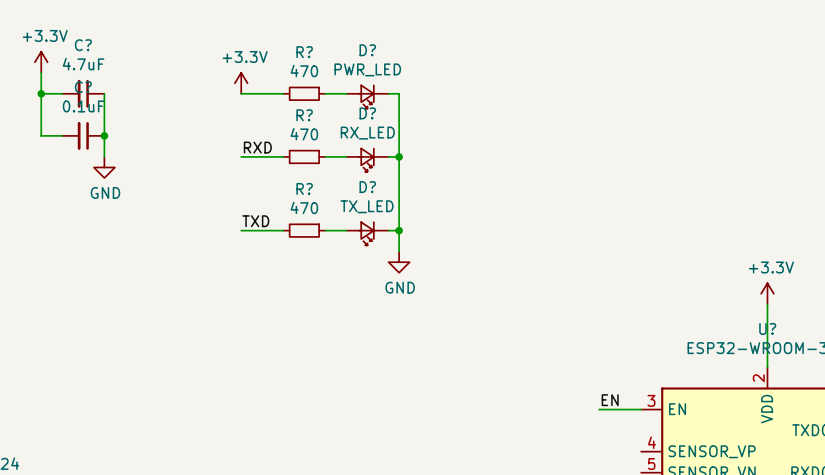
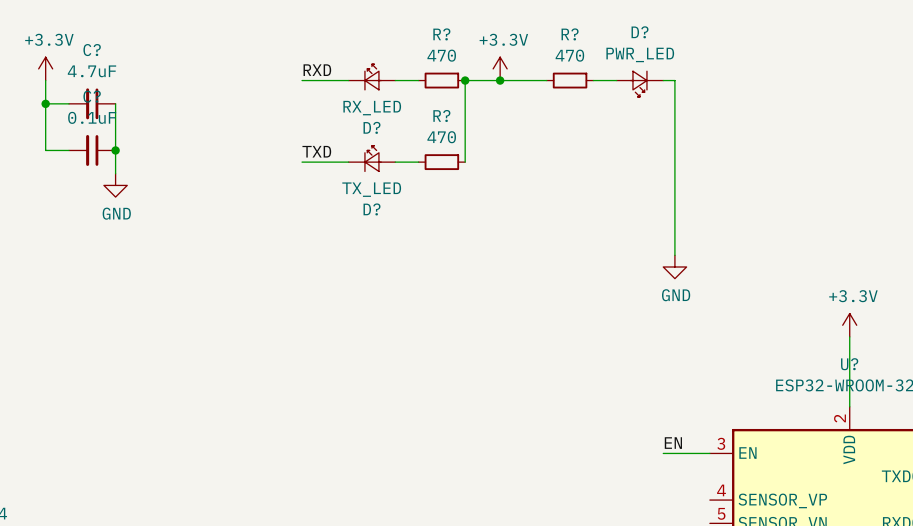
power symbol: none -> +3.3V (500, 68)
R?: none -> 470 (441, 80)
junction: none -> (465, 80)
junction: none -> (500, 80)
wire: none -> (546, 80) (465, 80) (465, 162)
R?: none -> 470 (570, 80)
wire: none -> (593, 80) (616, 80)
wire: none -> (663, 80) (674, 80) (674, 255)
D?: none -> PWR_LED (639, 84)
power symbol: +3.3V (241, 83) -> none
wire: (241, 93) (283, 93) -> none
R?: 470 (304, 93) -> none
wire: (325, 93) (346, 93) -> none
wire: (388, 93) (399, 93) (399, 251) -> none
D?: PWR_LED (367, 96) -> none
R?: none -> 470 (441, 162)
label position: RXD (257, 147) -> RXD (317, 70)
wire: (241, 156) (283, 156) -> (302, 80) (348, 80)
R?: 470 (304, 156) -> none
wire: (325, 156) (346, 156) -> (395, 80) (418, 80)
wire: (388, 156) (399, 156) -> none
junction: (399, 156) -> none
D? rotation: 0° (366, 160) -> 180° (373, 77)
D? position: (367, 160) -> (371, 77)
label position: TXD (255, 221) -> TXD (316, 151)
wire: (241, 230) (283, 230) -> (302, 162) (348, 162)
R?: 470 (304, 230) -> none
wire: (325, 230) (346, 230) -> (395, 162) (418, 162)
wire: (388, 230) (399, 230) -> none
junction: (399, 230) -> none
D? rotation: 0° (366, 233) -> 180° (373, 158)
D? position: (367, 233) -> (371, 158)
power symbol: none -> GND (674, 266)
power symbol: GND (399, 262) -> none

